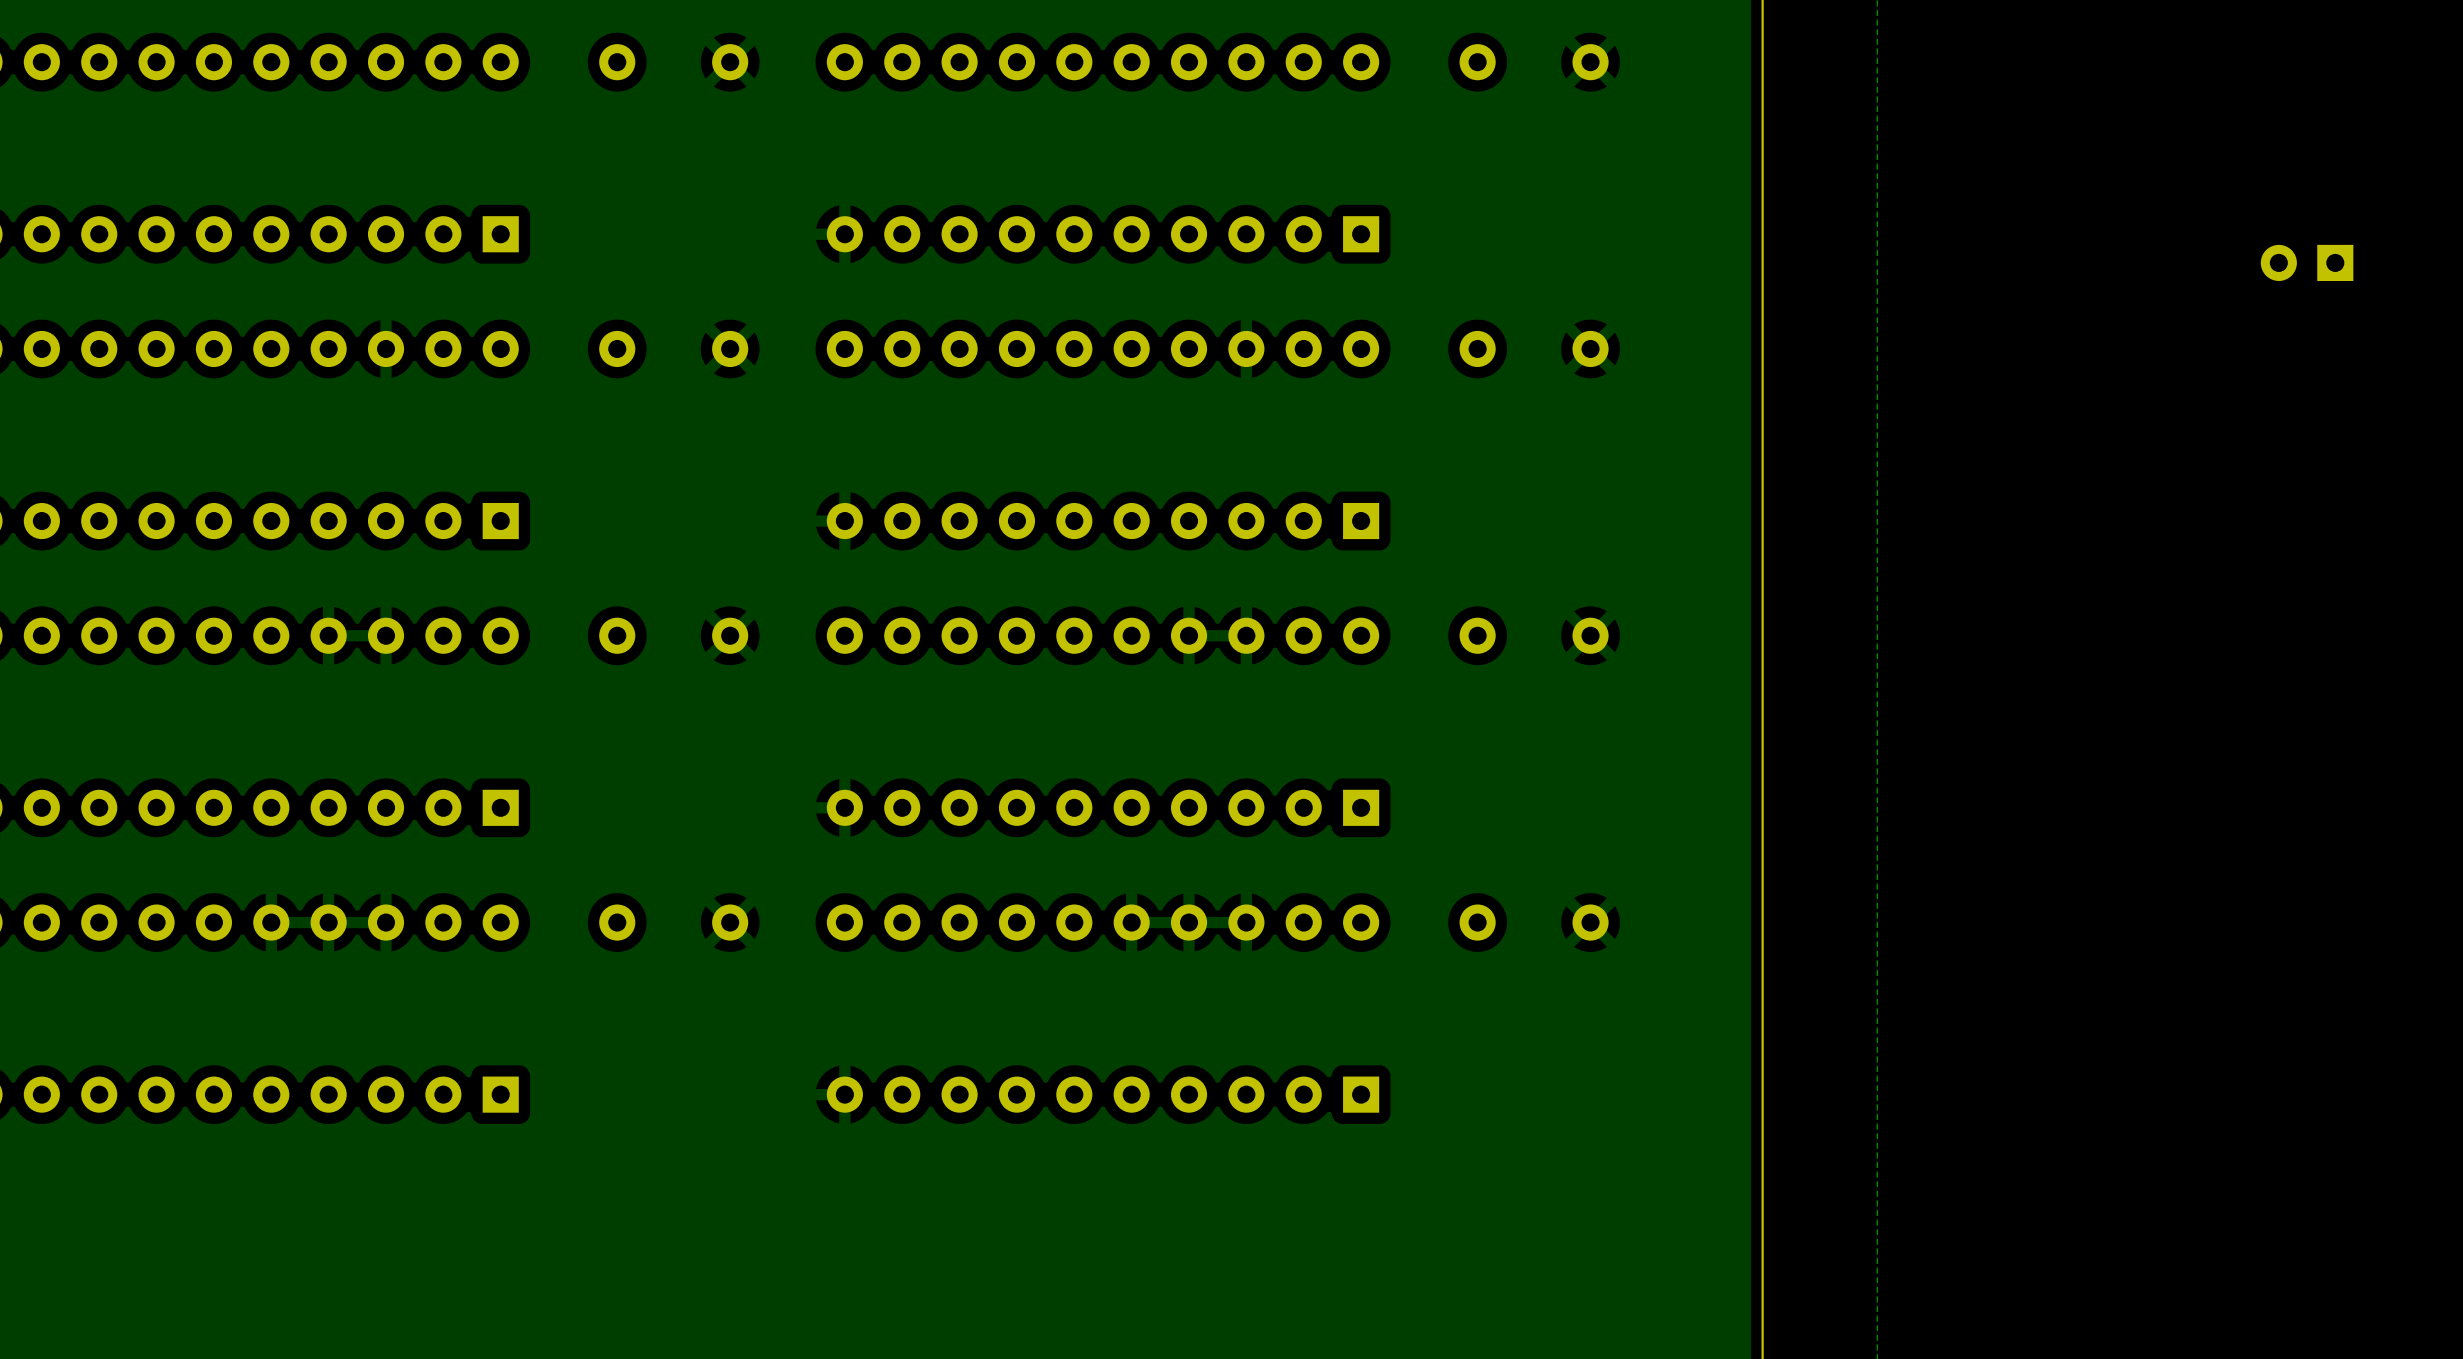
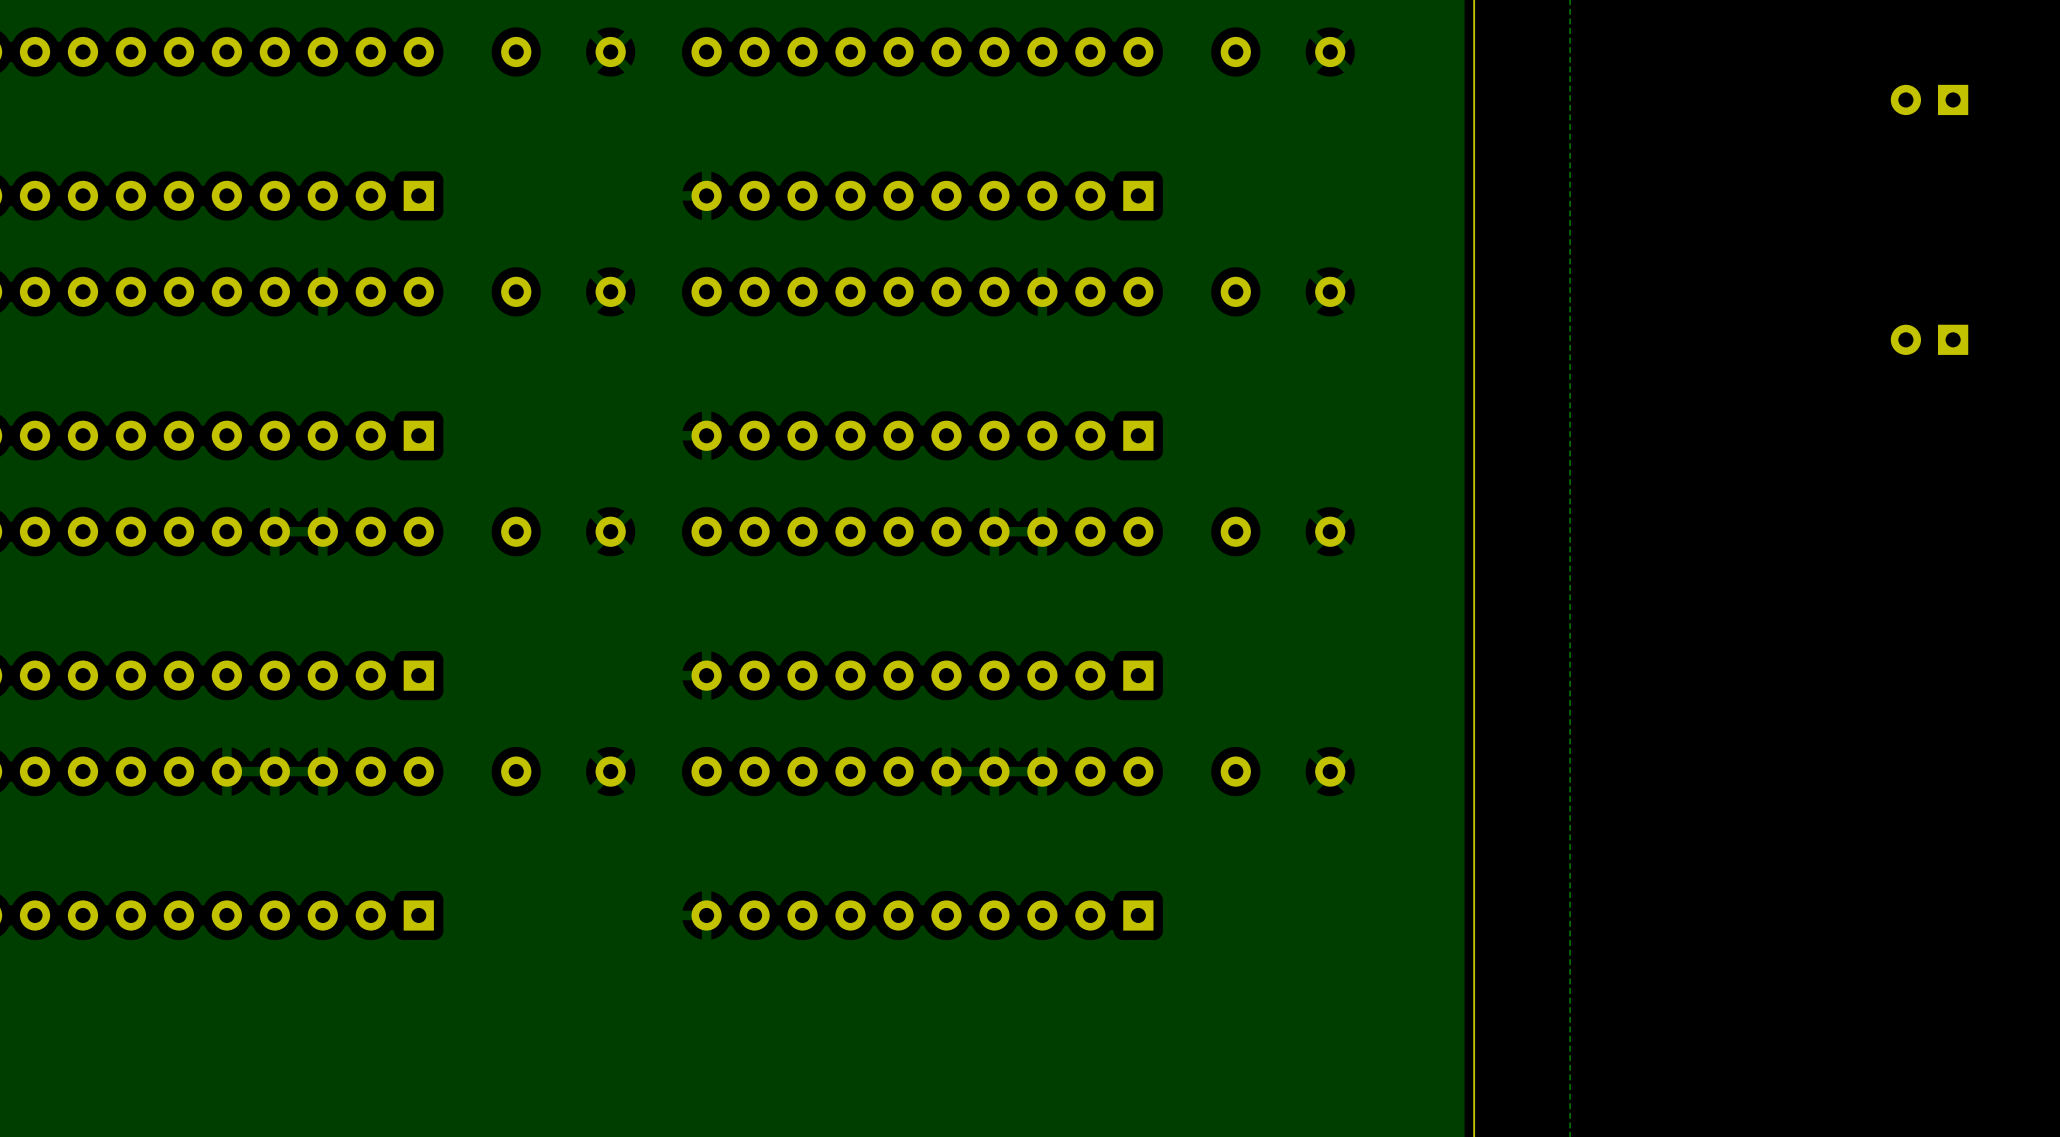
part: none -> (1929, 99)
part: (2307, 262) -> none
part: none -> (1929, 339)

